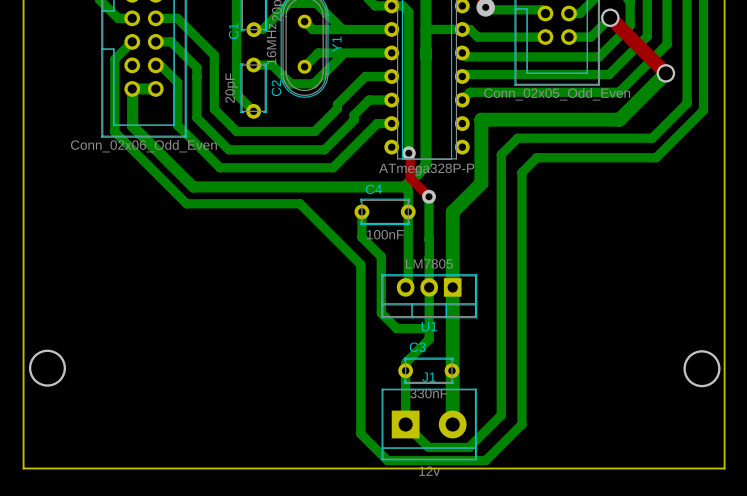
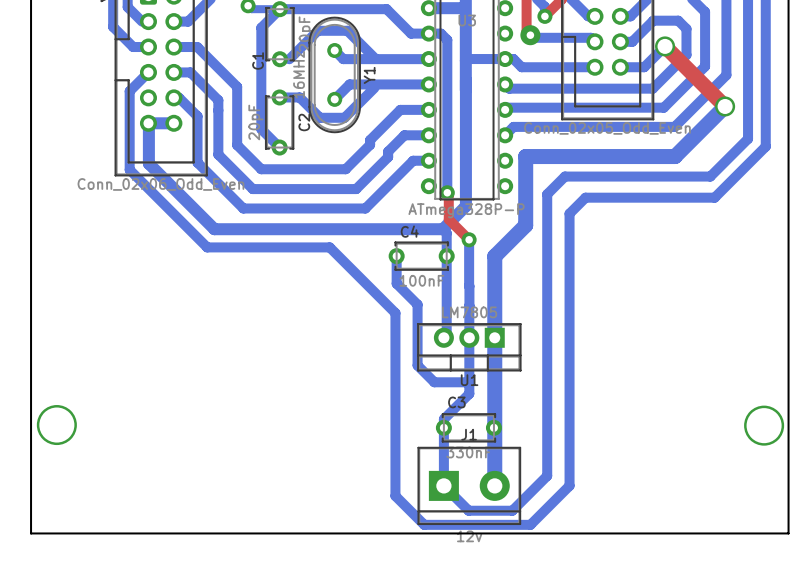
U1 footprint: [381, 274, 478, 319] -> [417, 323, 522, 372]

